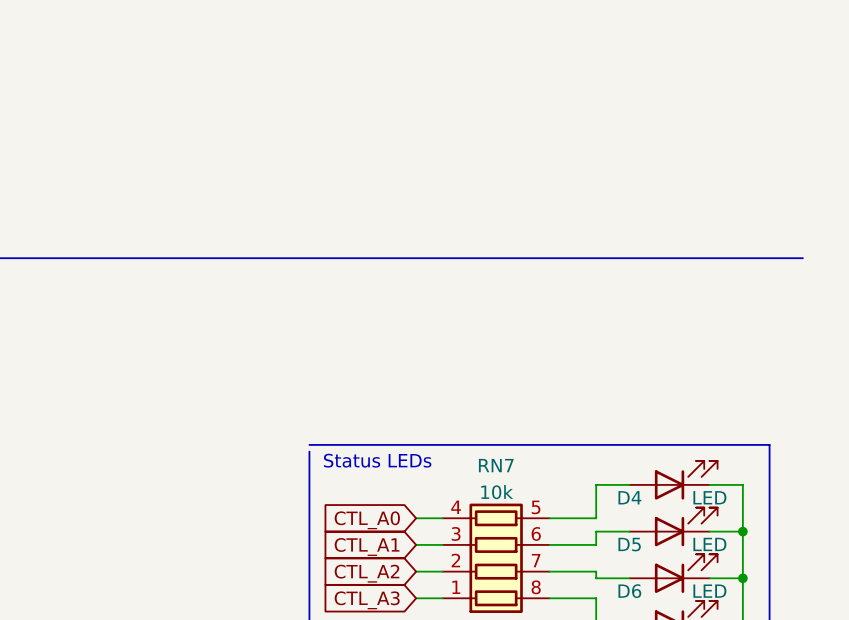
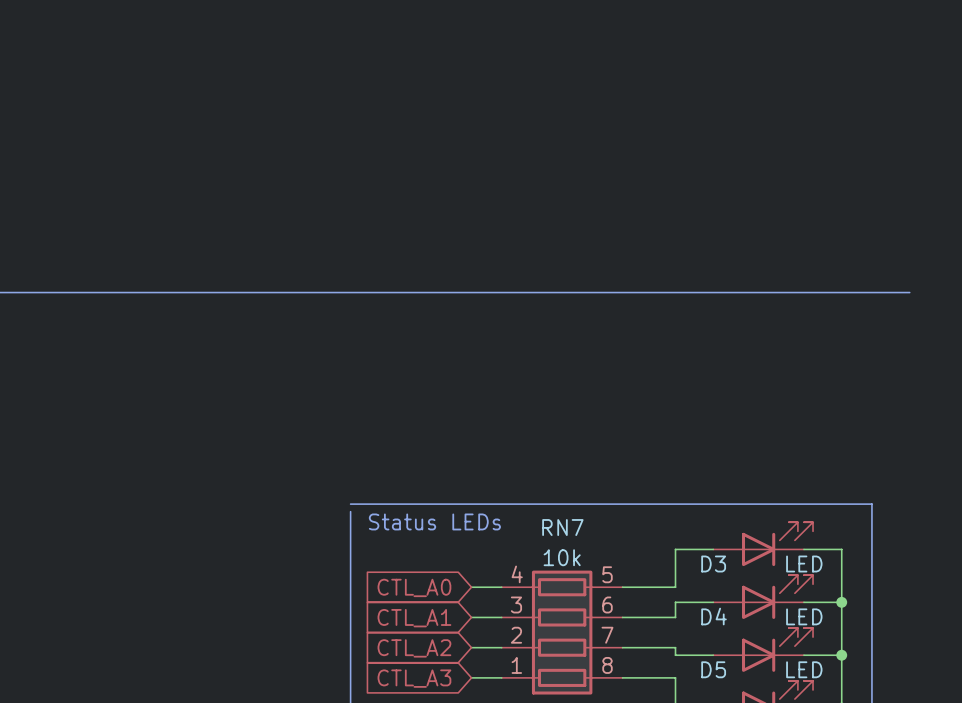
D4 name: D4 (629, 497) -> D3 (713, 564)
D5 name: D5 (629, 544) -> D4 (714, 616)
D6 name: D6 (629, 591) -> D5 (713, 669)

